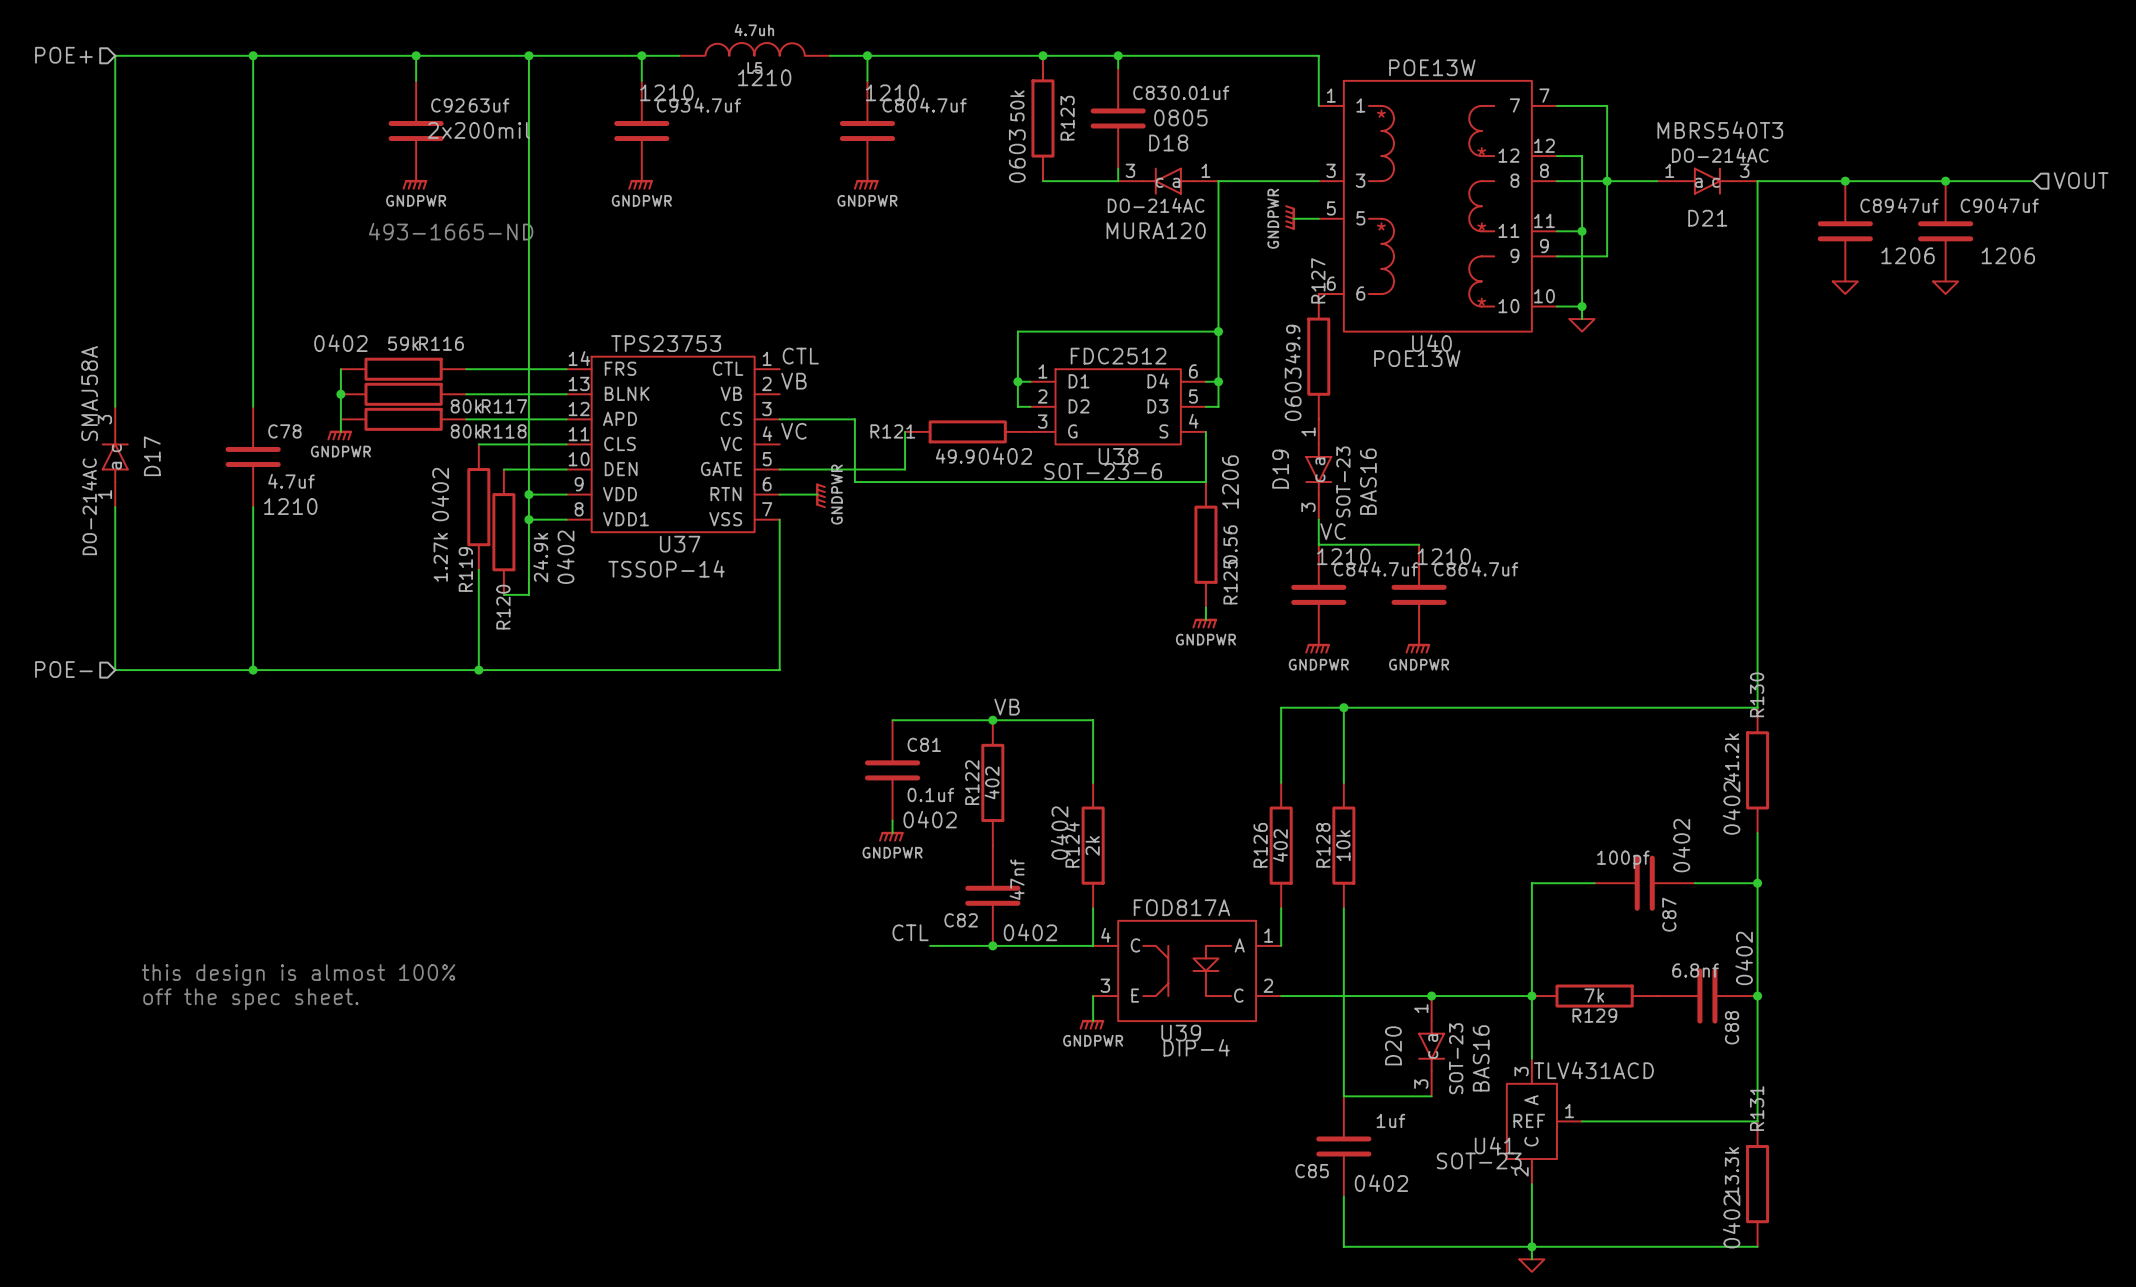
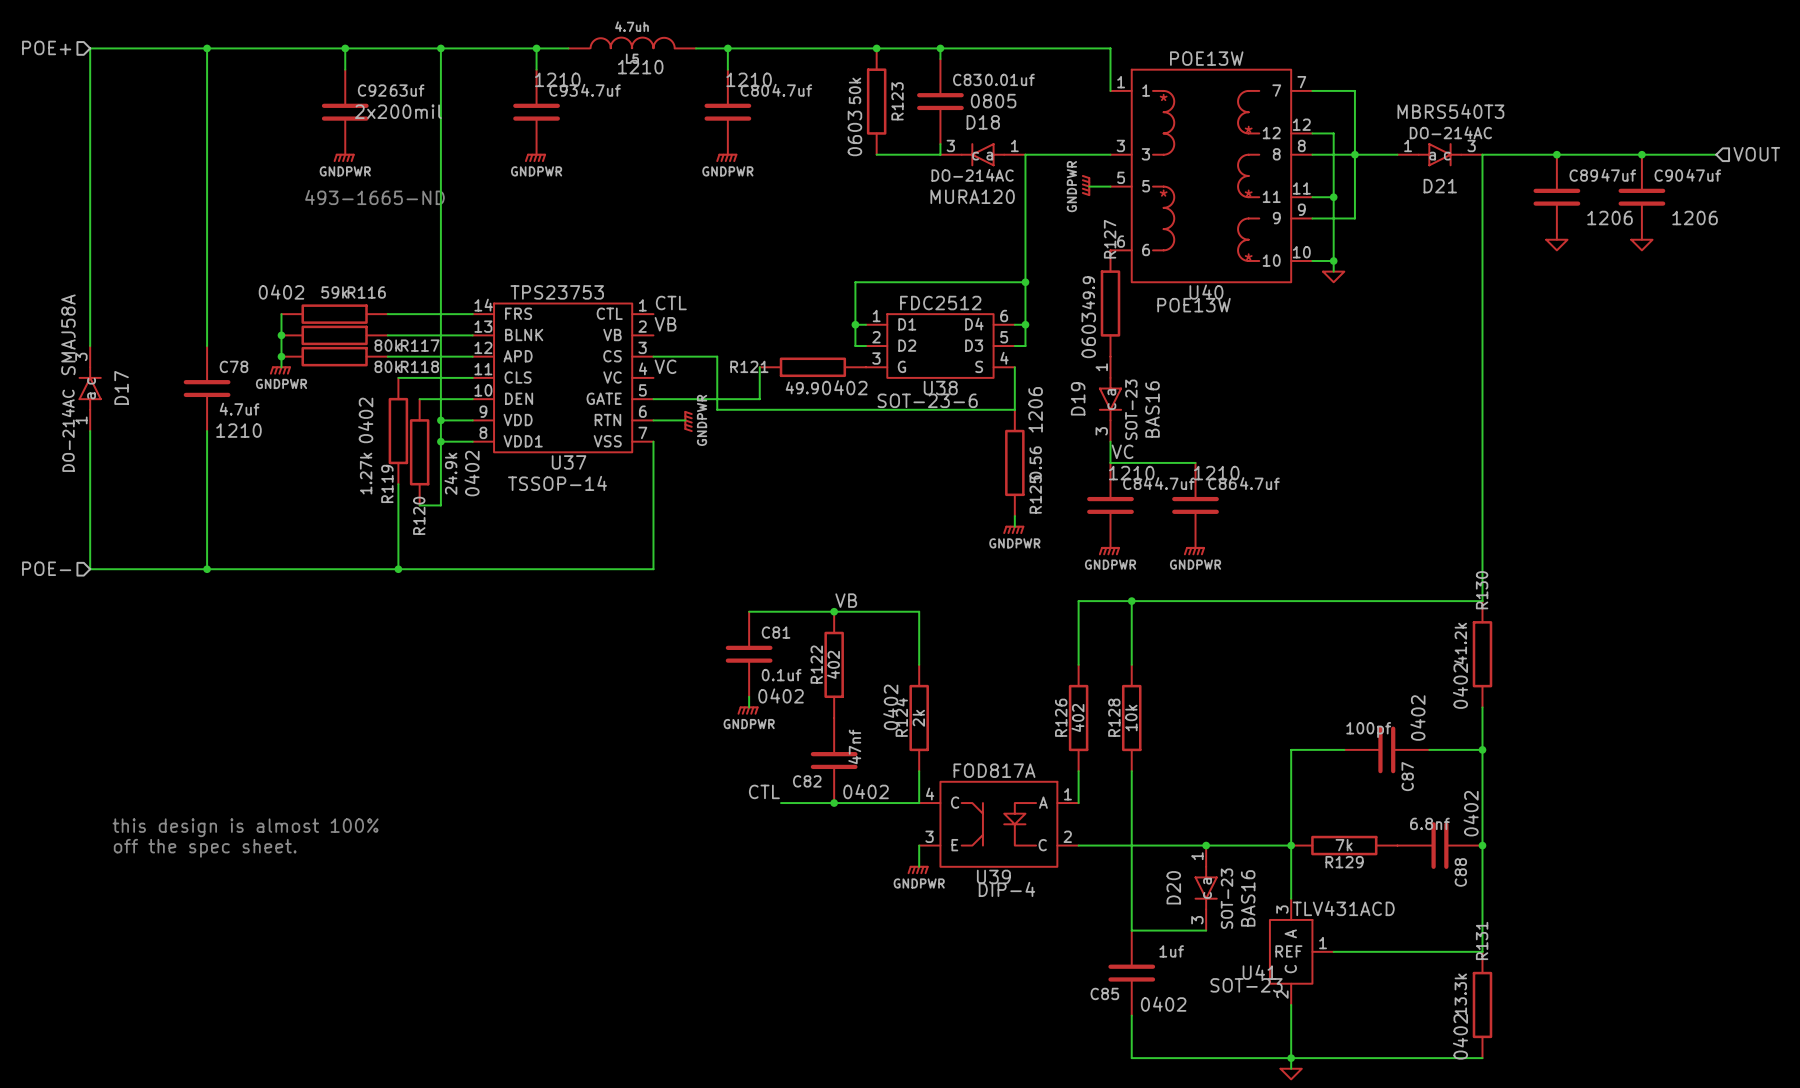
junction: none -> (281, 356)

